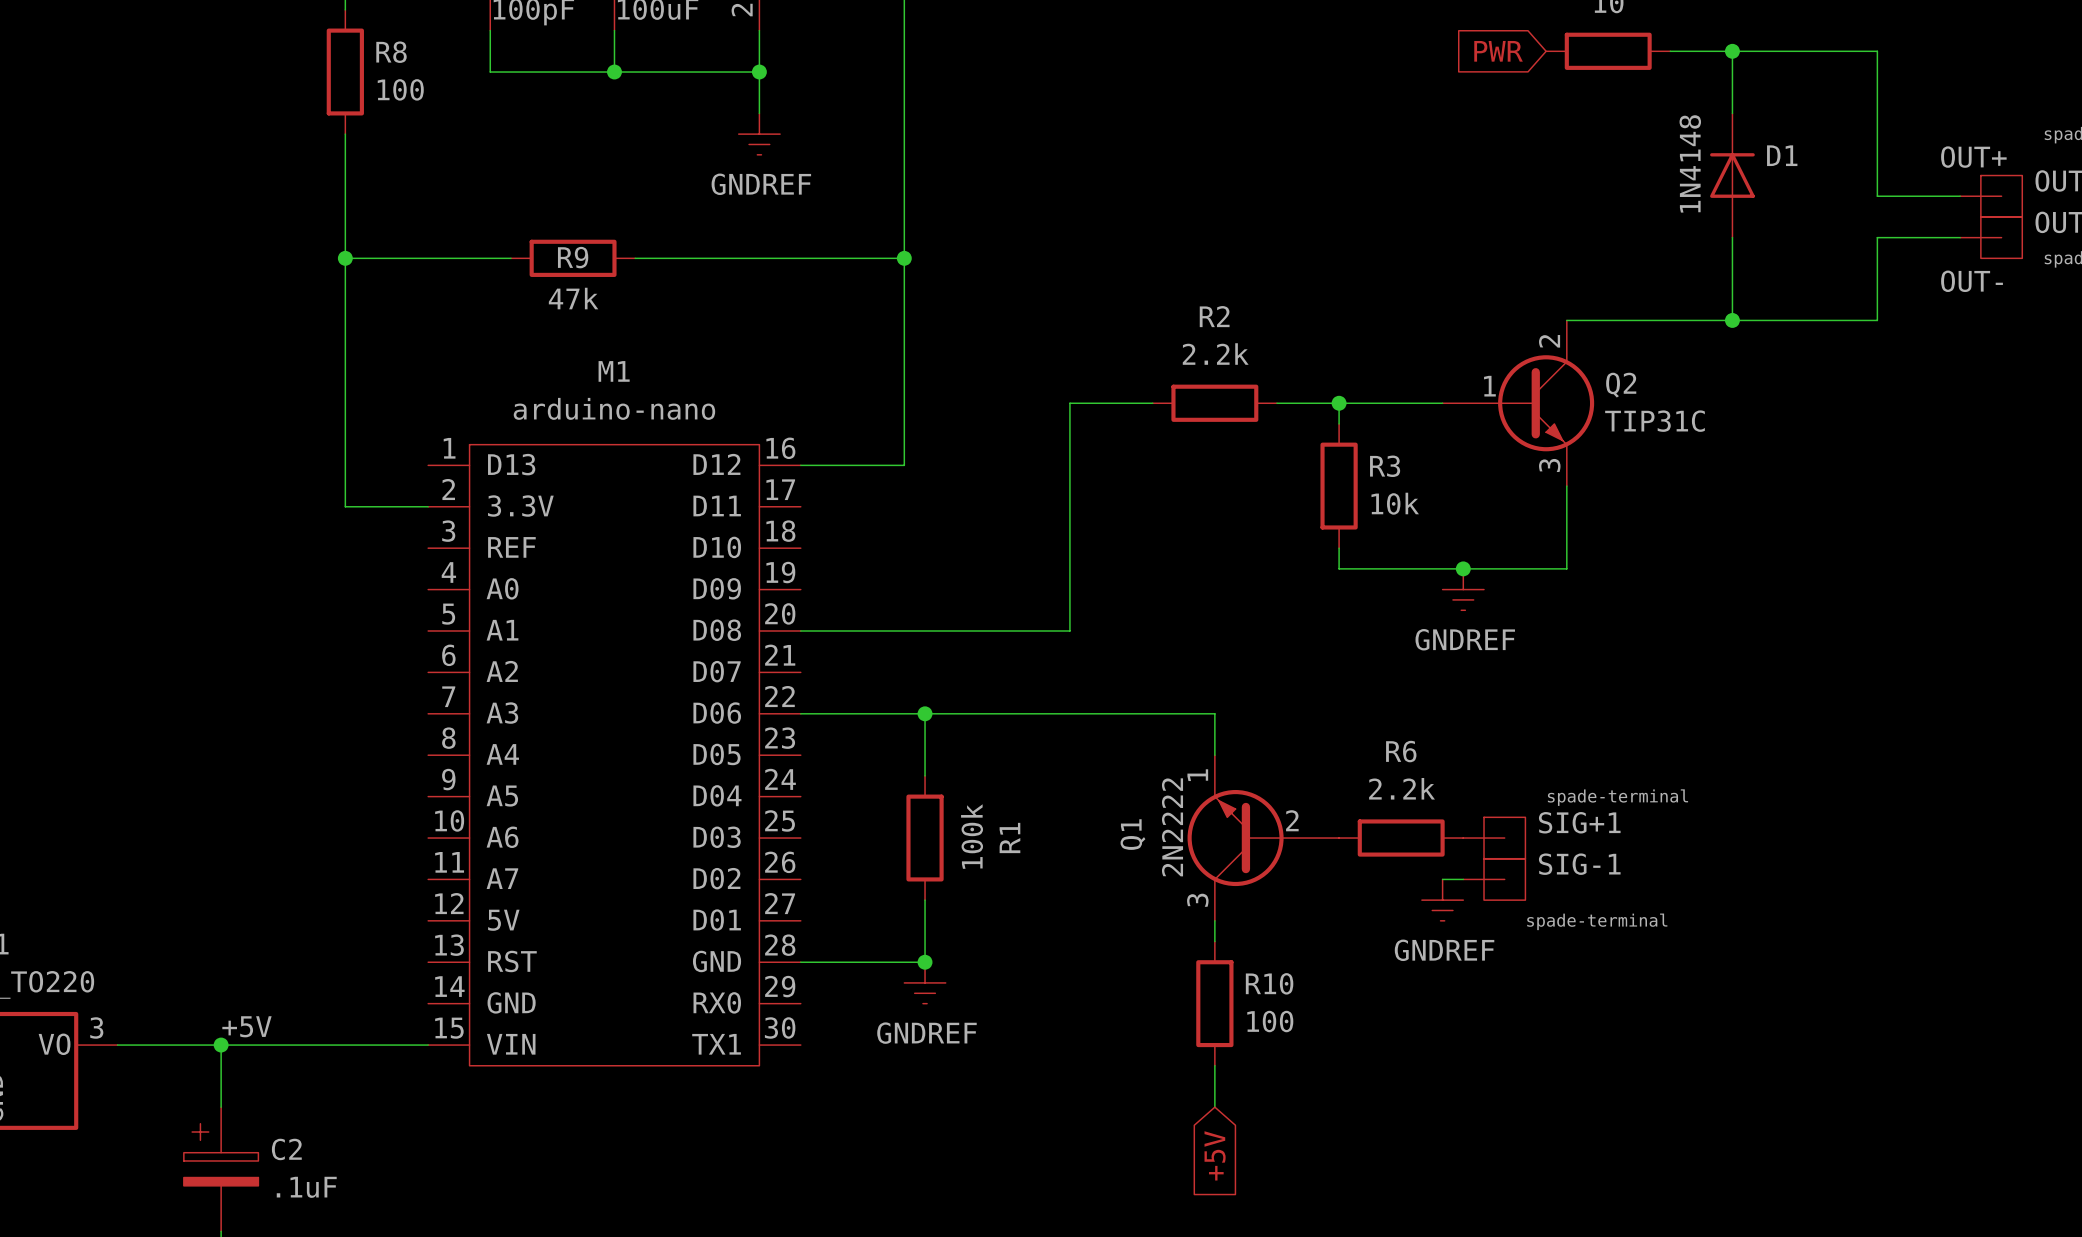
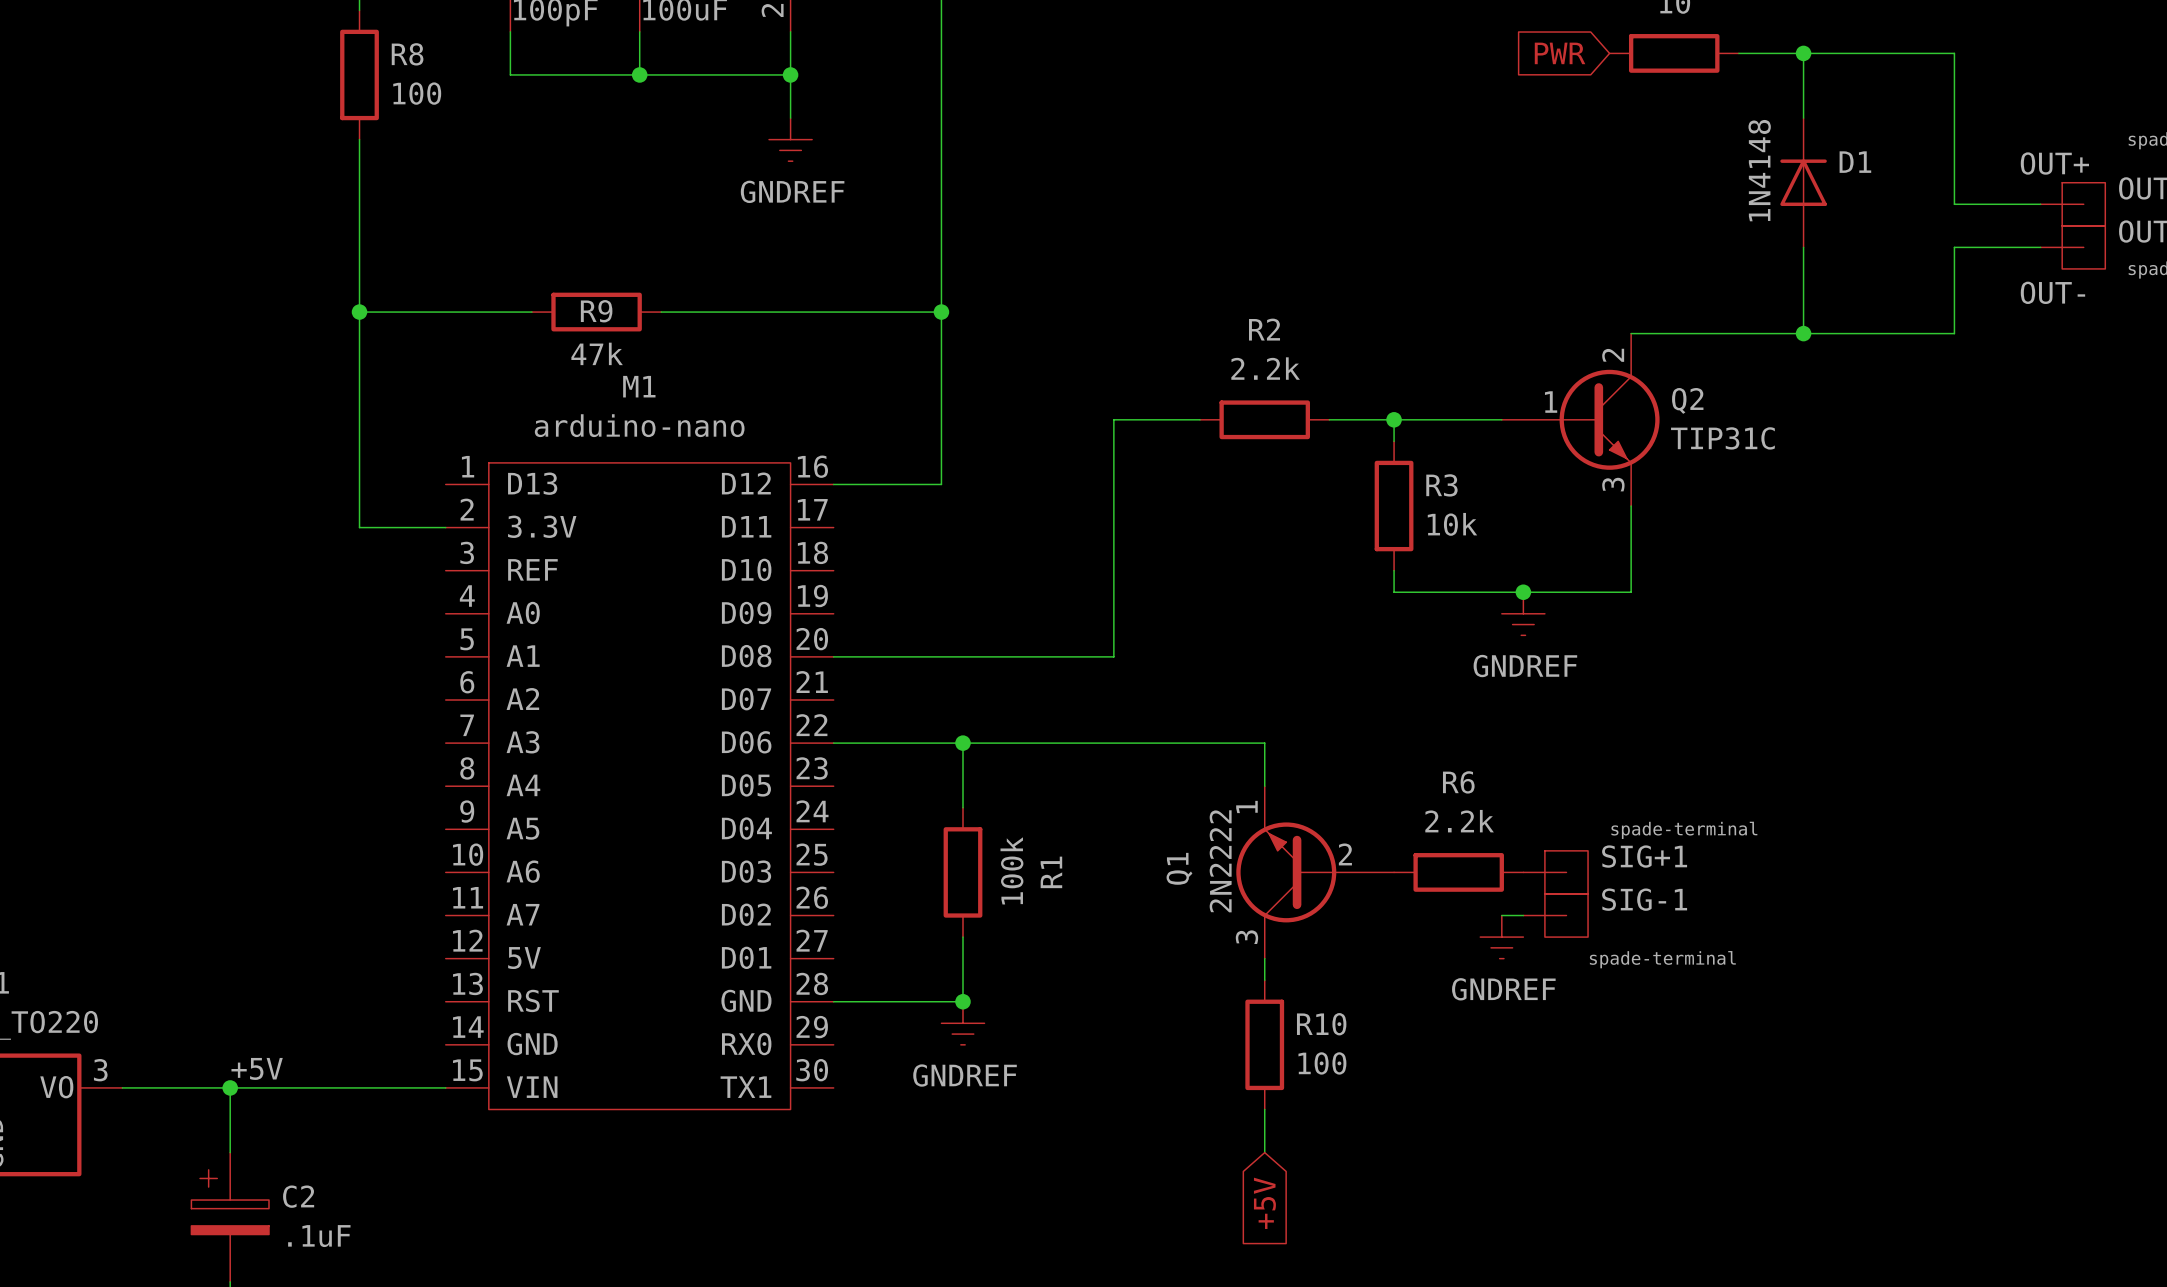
wire: (345, 258) (510, 258) -> (359, 312) (531, 312)
junction position: (345, 258) -> (359, 312)
R9 position: (573, 258) -> (596, 312)
wire: (635, 258) (904, 258) -> (661, 312) (941, 312)
junction position: (904, 258) -> (941, 312)

